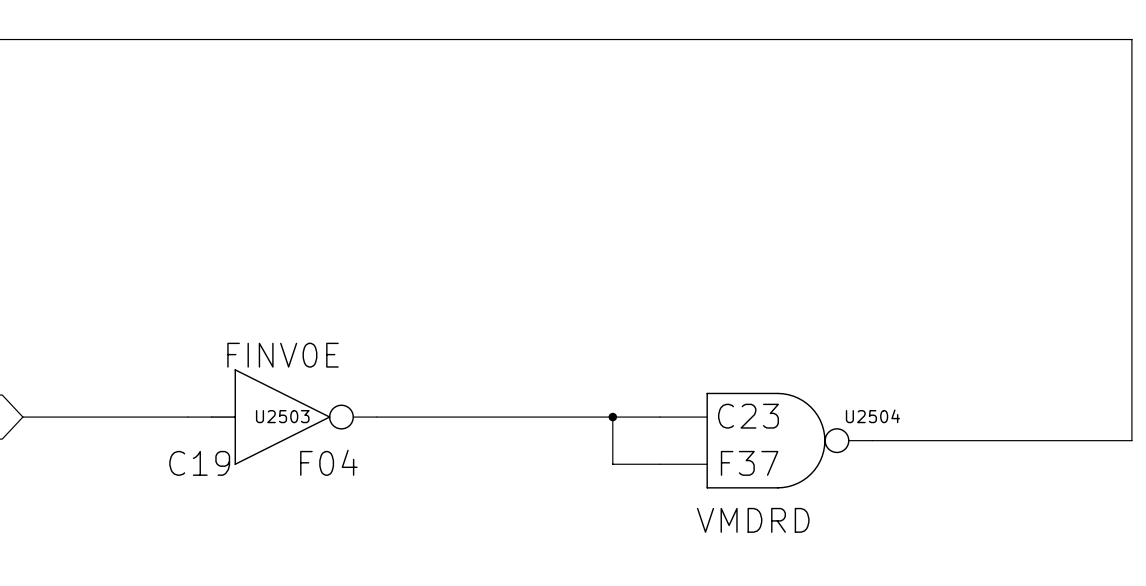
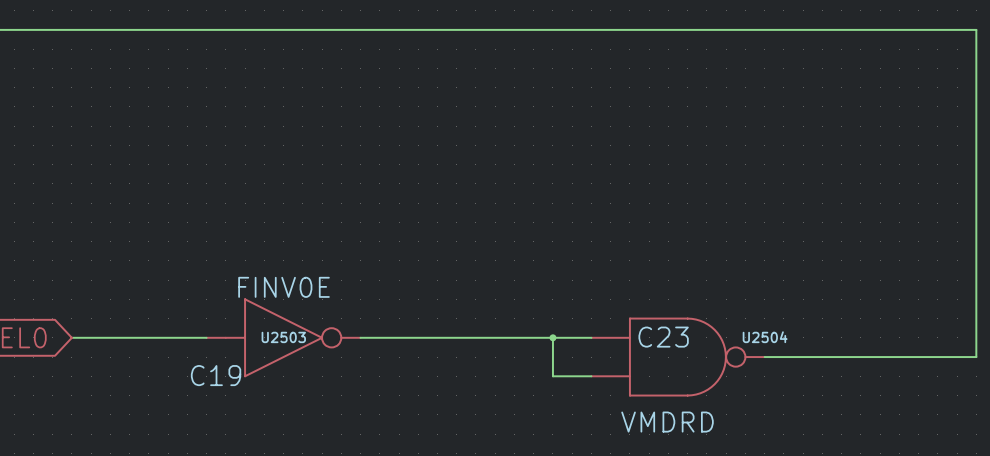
U2503 value: F04 (328, 462) -> none
U2504 value: F37 (749, 463) -> none

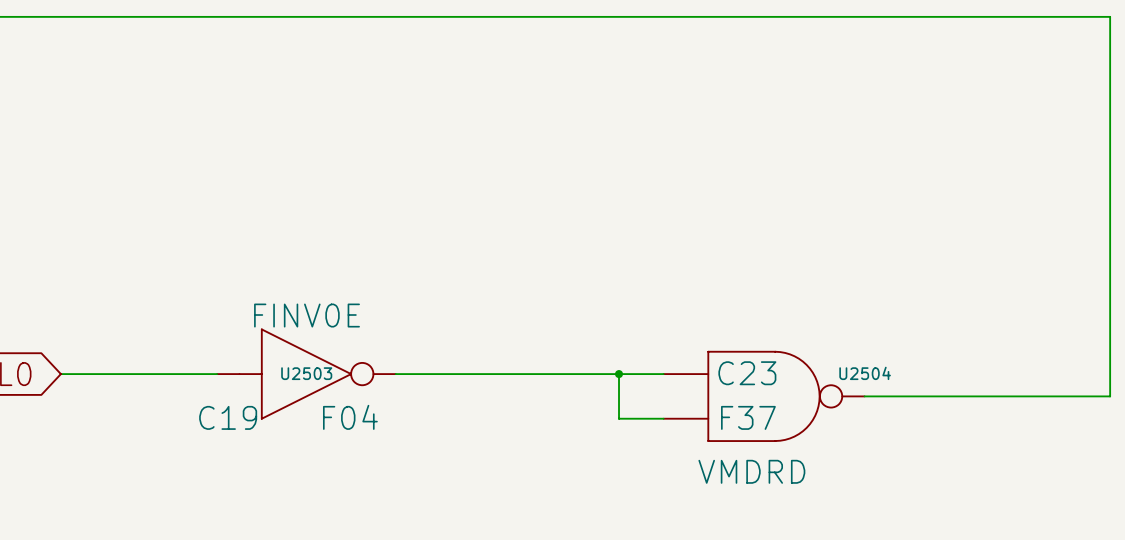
U2503 value: none -> F04 (350, 417)
U2504 value: none -> F37 (748, 417)

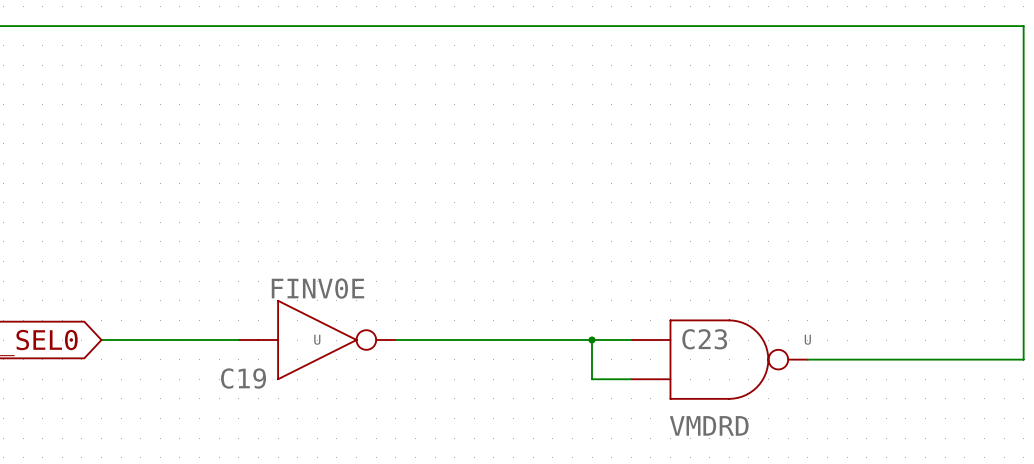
U2503 name: U2503 (306, 373) -> U (317, 339)
U2504 name: U2504 (865, 373) -> U (807, 339)
U2503 value: F04 (350, 417) -> none
U2504 value: F37 (748, 417) -> none

